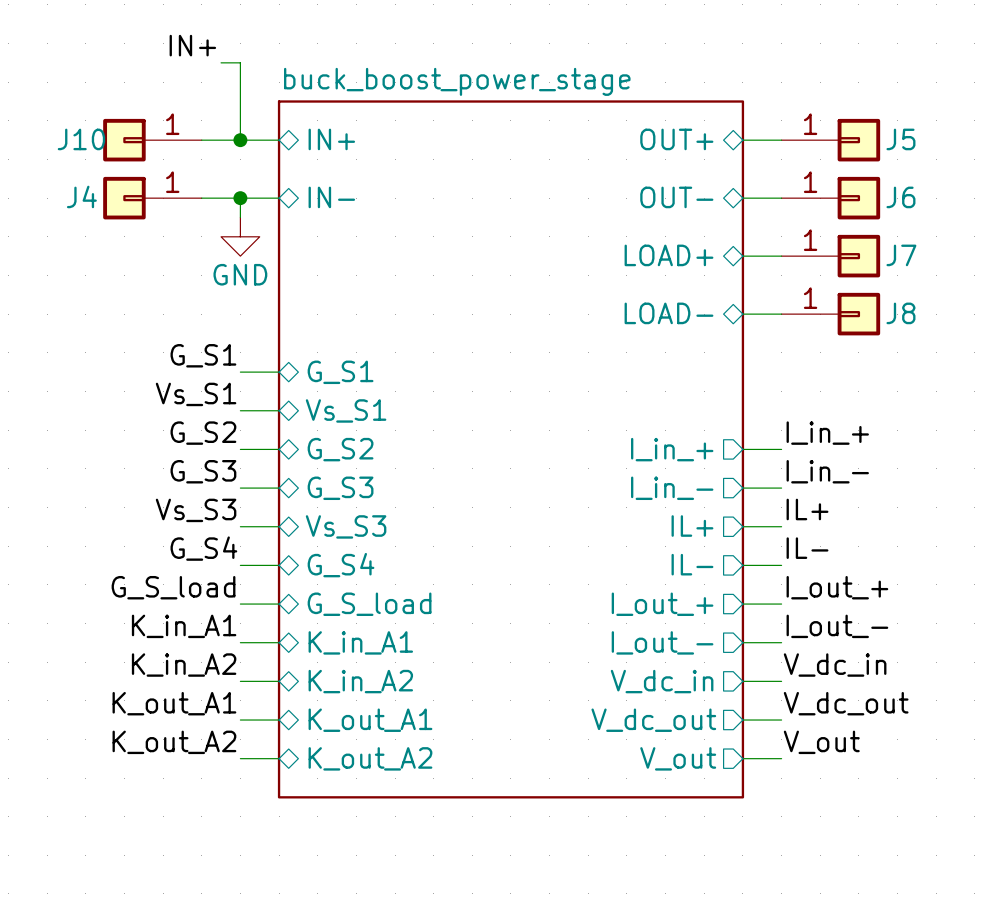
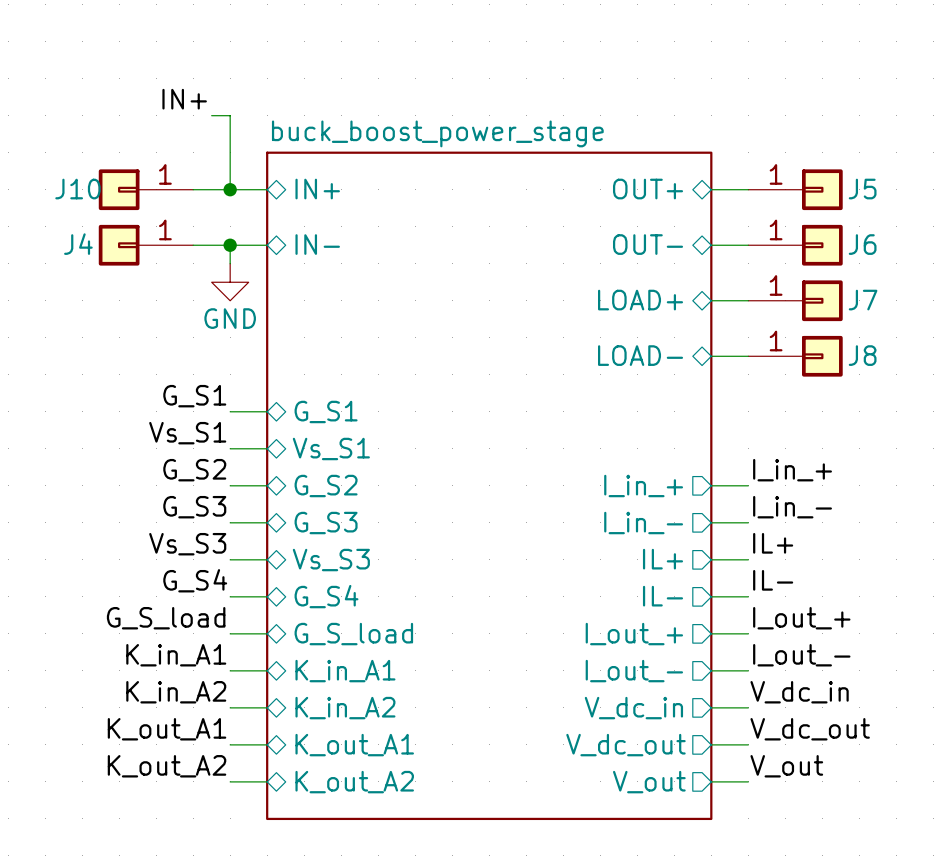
label position: IN+ (192, 45) -> IN+ (184, 99)
wire: (221, 62) (240, 62) (240, 120) -> (211, 115) (230, 115)
sheet pin: IN+ (331, 139) -> none
sheet pin: OUT+ (676, 139) -> none
J10: (152, 140) -> none
wire: (201, 140) (279, 140) -> (193, 245) (267, 245)
junction: (240, 140) -> none
wire: (742, 140) (781, 140) -> (711, 356) (748, 356)
J5: (830, 140) -> none
J4 name: J4 (81, 196) -> J10 (77, 189)
sheet pin: IN- (331, 197) -> IN+ (317, 189)
sheet pin: OUT- (676, 197) -> OUT+ (648, 189)
J6 name: J6 (900, 197) -> J5 (862, 189)
wire: (240, 198) (240, 217) -> (230, 189) (230, 134)
power symbol position: GND (240, 236) -> GND (230, 282)
sheet pin: none -> IN- (317, 244)
sheet pin: LOAD+ (668, 255) -> OUT- (648, 244)
J7 name: J7 (901, 255) -> J6 (862, 244)
J4: none -> (145, 245)
wire: none -> (230, 245) (230, 263)
junction: none -> (230, 245)
sheet pin: LOAD- (668, 313) -> LOAD+ (640, 300)
J8 name: J8 (900, 313) -> J7 (863, 300)
label position: G_S1 (203, 355) -> G_S1 (194, 396)
sheet pin: none -> LOAD- (640, 355)
wire: (240, 372) (279, 372) -> (230, 411) (267, 411)
sheet pin position: G_S1 (340, 372) -> G_S1 (326, 411)
J8: none -> (795, 356)
label position: Vs_S1 (196, 394) -> Vs_S1 (187, 433)
wire: (240, 410) (279, 410) -> (230, 448) (267, 448)
sheet pin position: Vs_S1 (346, 410) -> Vs_S1 (331, 448)
label position: G_S2 (203, 433) -> G_S2 (194, 470)
label position: I_in_+ (827, 433) -> I_in_+ (792, 470)
wire: (240, 449) (279, 449) -> (230, 485) (267, 485)
sheet pin position: G_S2 (340, 449) -> G_S2 (326, 486)
sheet buck_boost_power_stage position: (510, 449) -> (489, 485)
sheet pin position: I_in_+ (672, 449) -> I_in_+ (643, 486)
wire: (742, 449) (781, 449) -> (711, 485) (748, 485)
label position: G_S3 (203, 471) -> G_S3 (194, 507)
label position: I_in_- (827, 471) -> I_in_- (792, 507)
wire: (240, 488) (279, 488) -> (230, 522) (267, 522)
sheet pin position: G_S3 (340, 488) -> G_S3 (326, 523)
sheet pin position: I_in_- (672, 488) -> I_in_- (643, 523)
wire: (742, 488) (781, 488) -> (711, 522) (748, 522)
label position: IL+ (807, 509) -> IL+ (773, 543)
label position: Vs_S3 (196, 510) -> Vs_S3 (187, 544)
wire: (240, 526) (279, 526) -> (230, 559) (267, 559)
sheet pin position: Vs_S3 (346, 526) -> Vs_S3 (331, 560)
sheet pin position: IL+ (692, 526) -> IL+ (663, 559)
wire: (742, 526) (781, 526) -> (711, 559) (748, 559)
label position: G_S4 (203, 548) -> G_S4 (195, 580)
label position: IL- (807, 548) -> IL- (773, 580)
sheet pin position: IL- (692, 564) -> IL- (663, 596)
wire: (240, 565) (279, 565) -> (230, 596) (267, 596)
sheet pin position: G_S4 (341, 565) -> G_S4 (326, 596)
wire: (742, 565) (781, 565) -> (711, 596) (748, 596)
label position: G_S_load (173, 587) -> G_S_load (166, 618)
label position: I_out_+ (837, 587) -> I_out_+ (801, 618)
wire: (240, 604) (279, 604) -> (230, 633) (267, 633)
sheet pin position: G_S_load (369, 604) -> G_S_load (353, 634)
sheet pin position: I_out_+ (662, 604) -> I_out_+ (634, 634)
wire: (742, 604) (781, 604) -> (711, 633) (748, 633)
label position: K_in_A1 (184, 626) -> K_in_A1 (176, 655)
label position: I_out_- (837, 626) -> I_out_- (801, 655)
wire: (240, 642) (279, 642) -> (230, 670) (267, 670)
sheet pin position: K_in_A1 (360, 642) -> K_in_A1 (345, 671)
sheet pin position: I_out_- (662, 642) -> I_out_- (634, 671)
wire: (742, 642) (781, 642) -> (711, 670) (748, 670)
label position: K_in_A2 (184, 665) -> K_in_A2 (176, 692)
label position: V_dc_in (835, 665) -> V_dc_in (799, 692)
wire: (240, 681) (279, 681) -> (230, 707) (267, 707)
sheet pin position: K_in_A2 (360, 681) -> K_in_A2 (345, 708)
sheet pin position: V_dc_in (662, 681) -> V_dc_in (633, 708)
wire: (742, 681) (781, 681) -> (711, 707) (748, 707)
label position: K_out_A1 (174, 703) -> K_out_A1 (167, 729)
label position: V_dc_out (846, 703) -> V_dc_out (810, 729)
wire: (240, 720) (279, 720) -> (230, 744) (267, 744)
sheet pin position: K_out_A1 (370, 720) -> K_out_A1 (354, 745)
sheet pin position: V_dc_out (653, 720) -> V_dc_out (625, 745)
wire: (742, 720) (781, 720) -> (711, 744) (748, 744)
label position: K_out_A2 (174, 742) -> K_out_A2 (167, 766)
label position: V_out (821, 742) -> V_out (786, 766)
wire: (240, 758) (279, 758) -> (230, 781) (267, 781)
sheet pin position: K_out_A2 (370, 758) -> K_out_A2 (354, 782)
sheet pin position: V_out (678, 758) -> V_out (649, 782)
wire: (742, 758) (781, 758) -> (711, 781) (748, 781)

